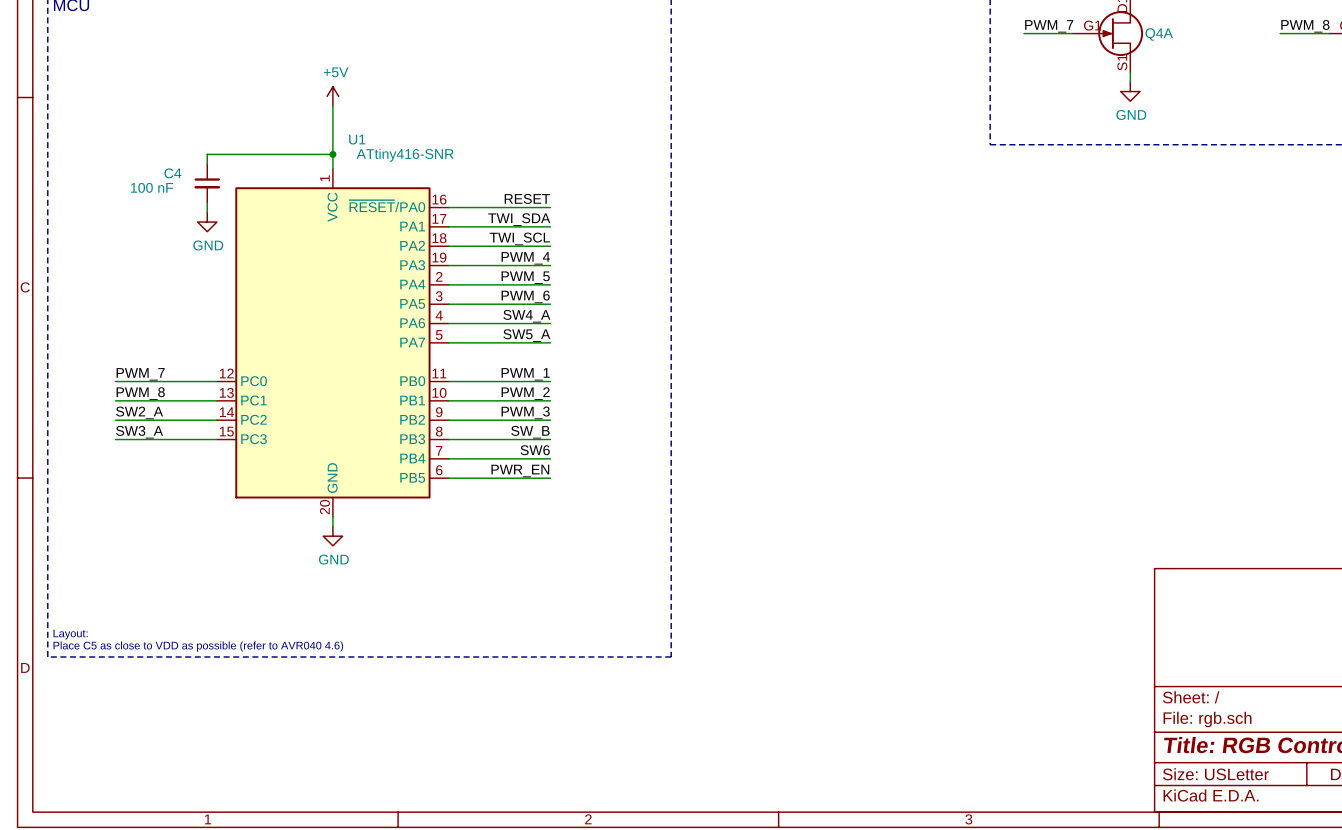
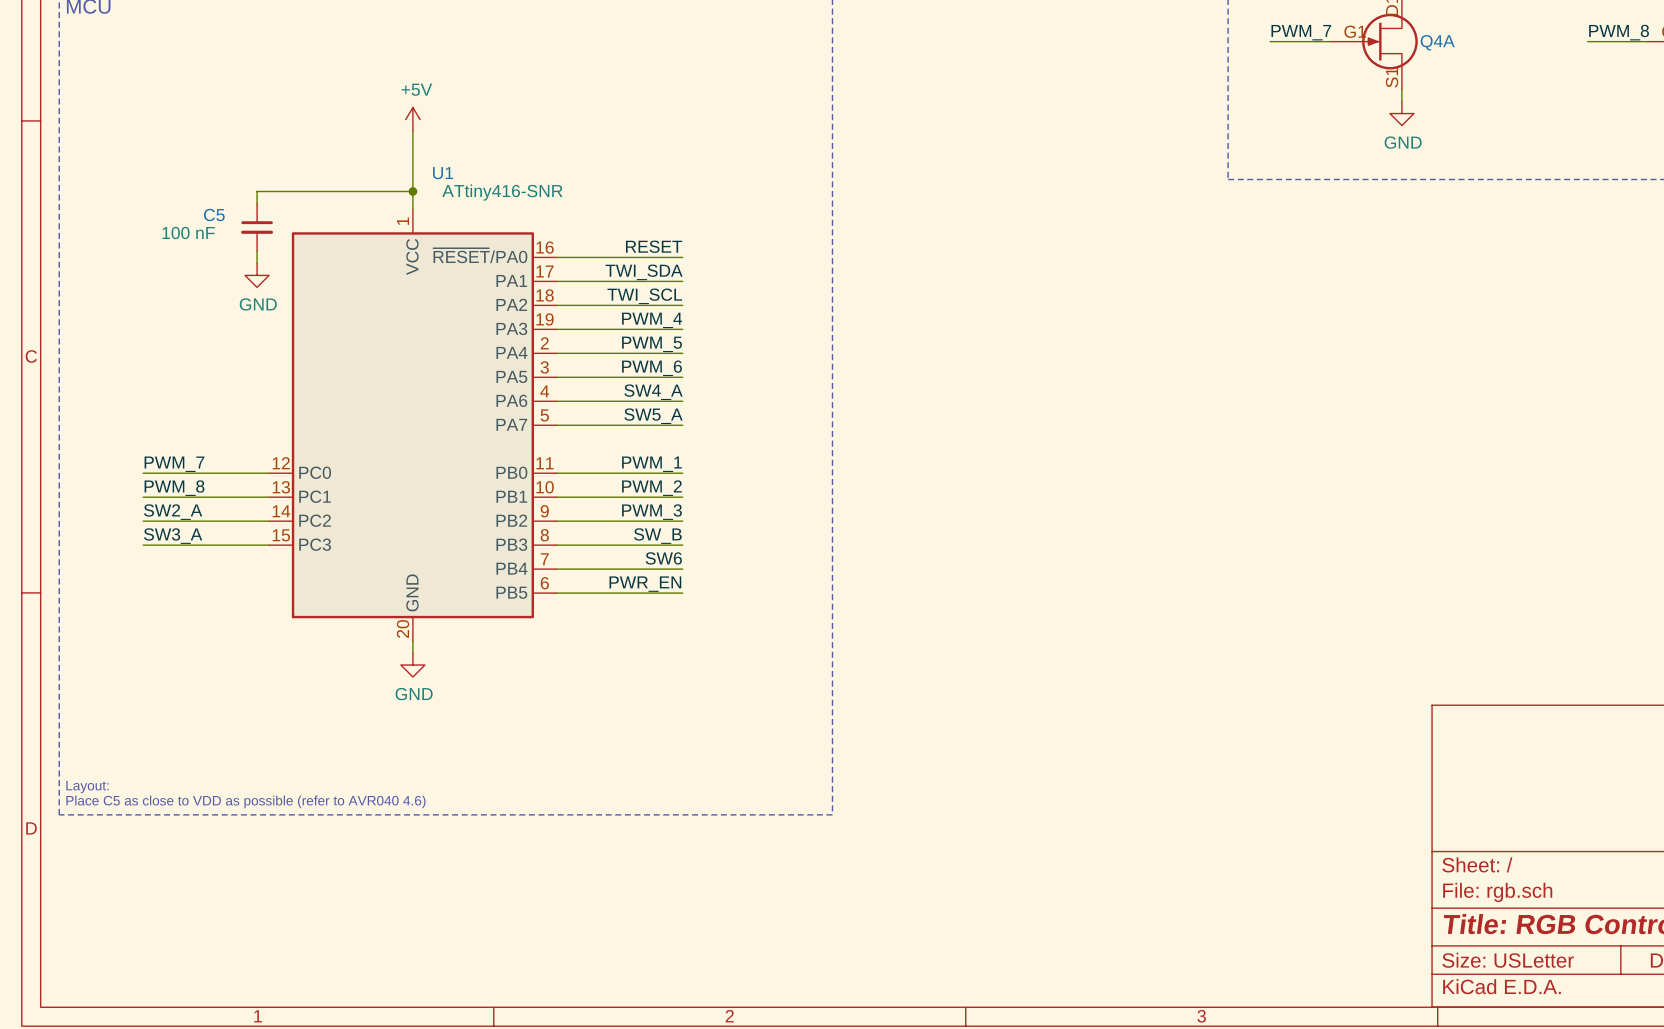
C4 name: C4 (172, 173) -> C5 (214, 215)

